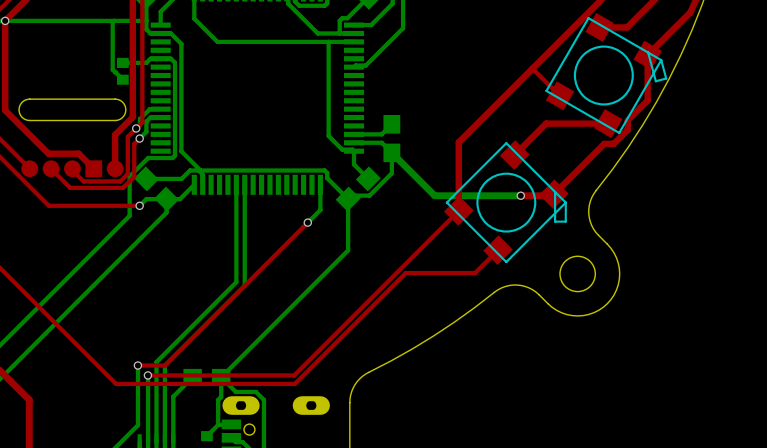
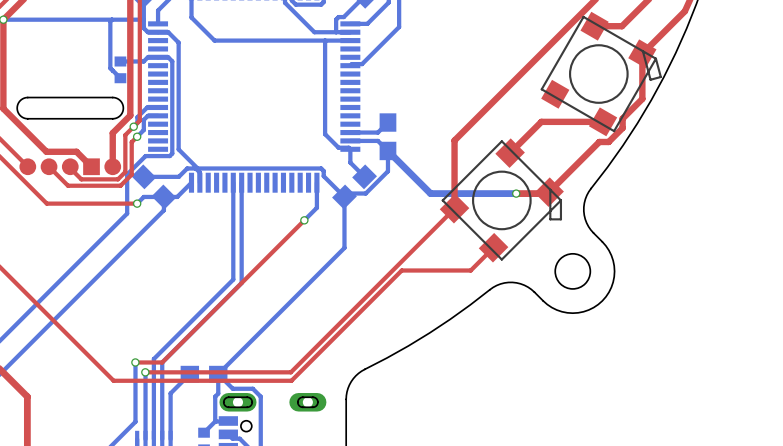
top track: (532, 68) (560, 95) -> none

